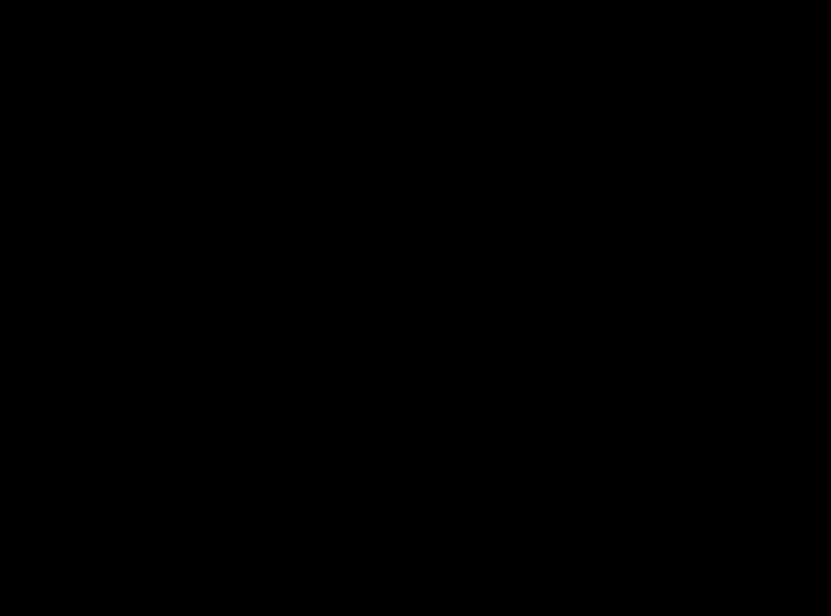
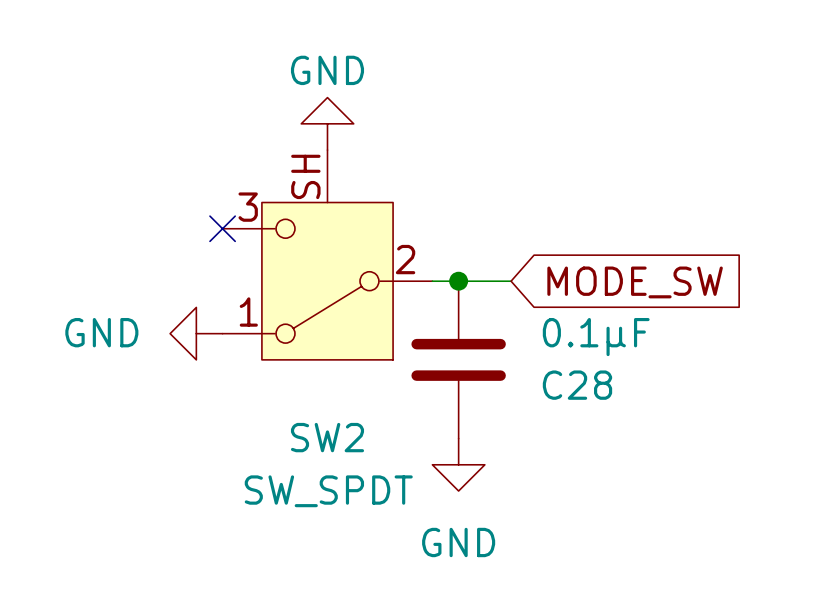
power symbol: none -> GND (327, 123)
no-connect mark: none -> (222, 228)
SW2: none -> SW_SPDT (327, 254)
wire: none -> (432, 281) (511, 281)
junction: none -> (458, 281)
global label: none -> MODE_SW (635, 282)
power symbol: none -> GND (196, 333)
C28: none -> 0.1µF (458, 359)
power symbol: none -> GND (458, 464)

